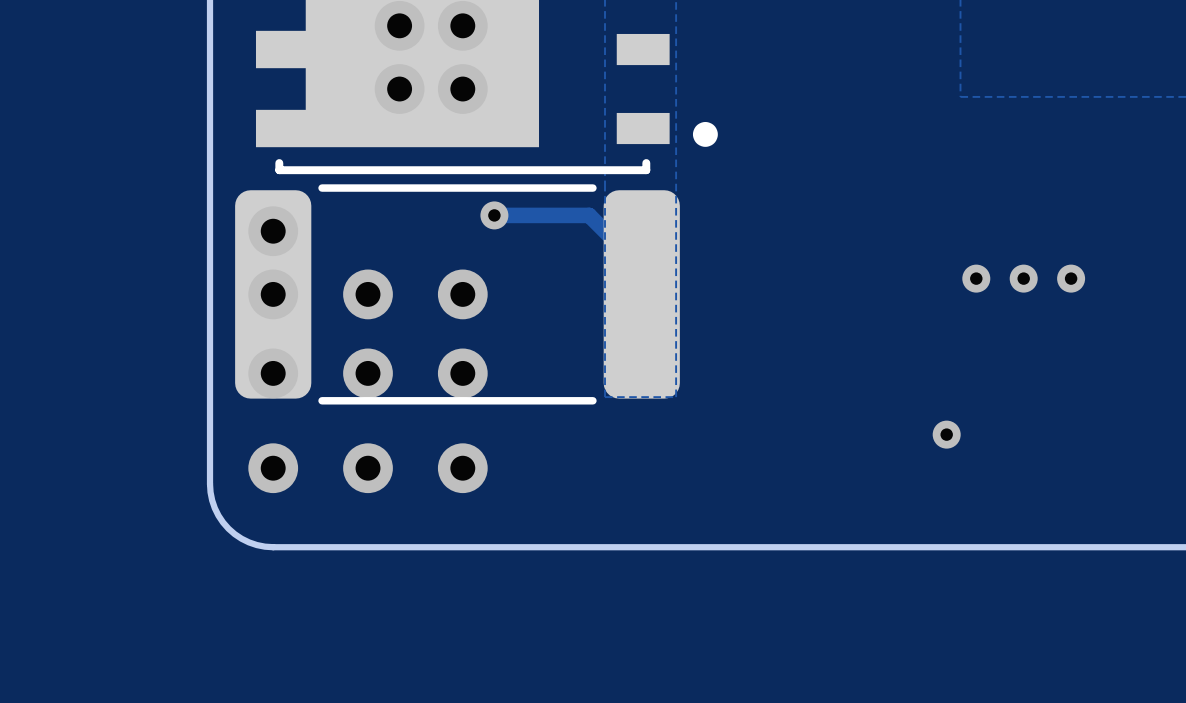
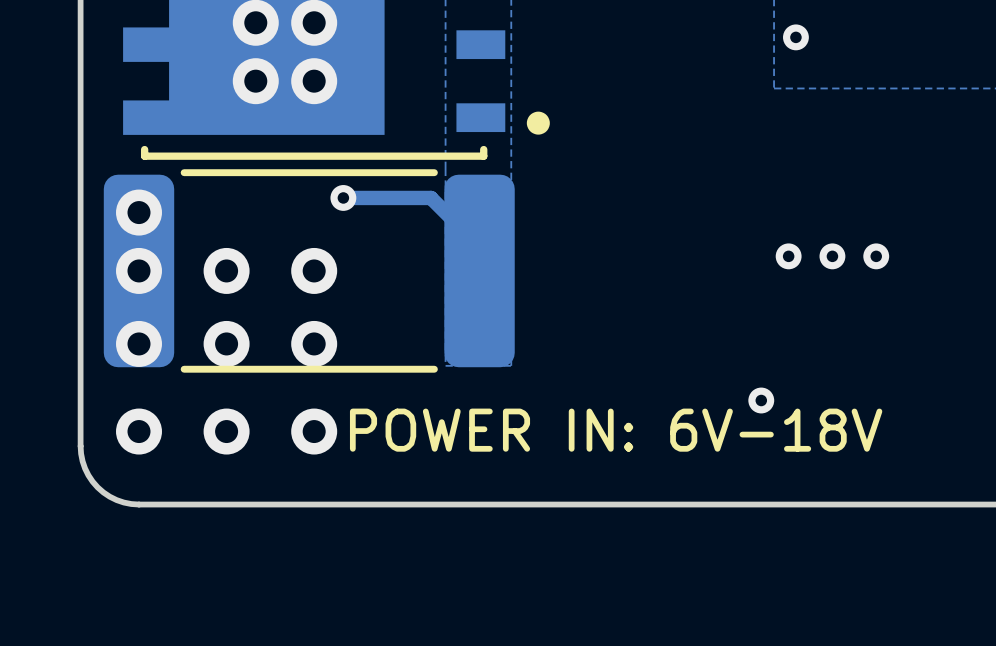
via: none -> (795, 37)
text: none -> POWER IN: 6V-18V (616, 430)

